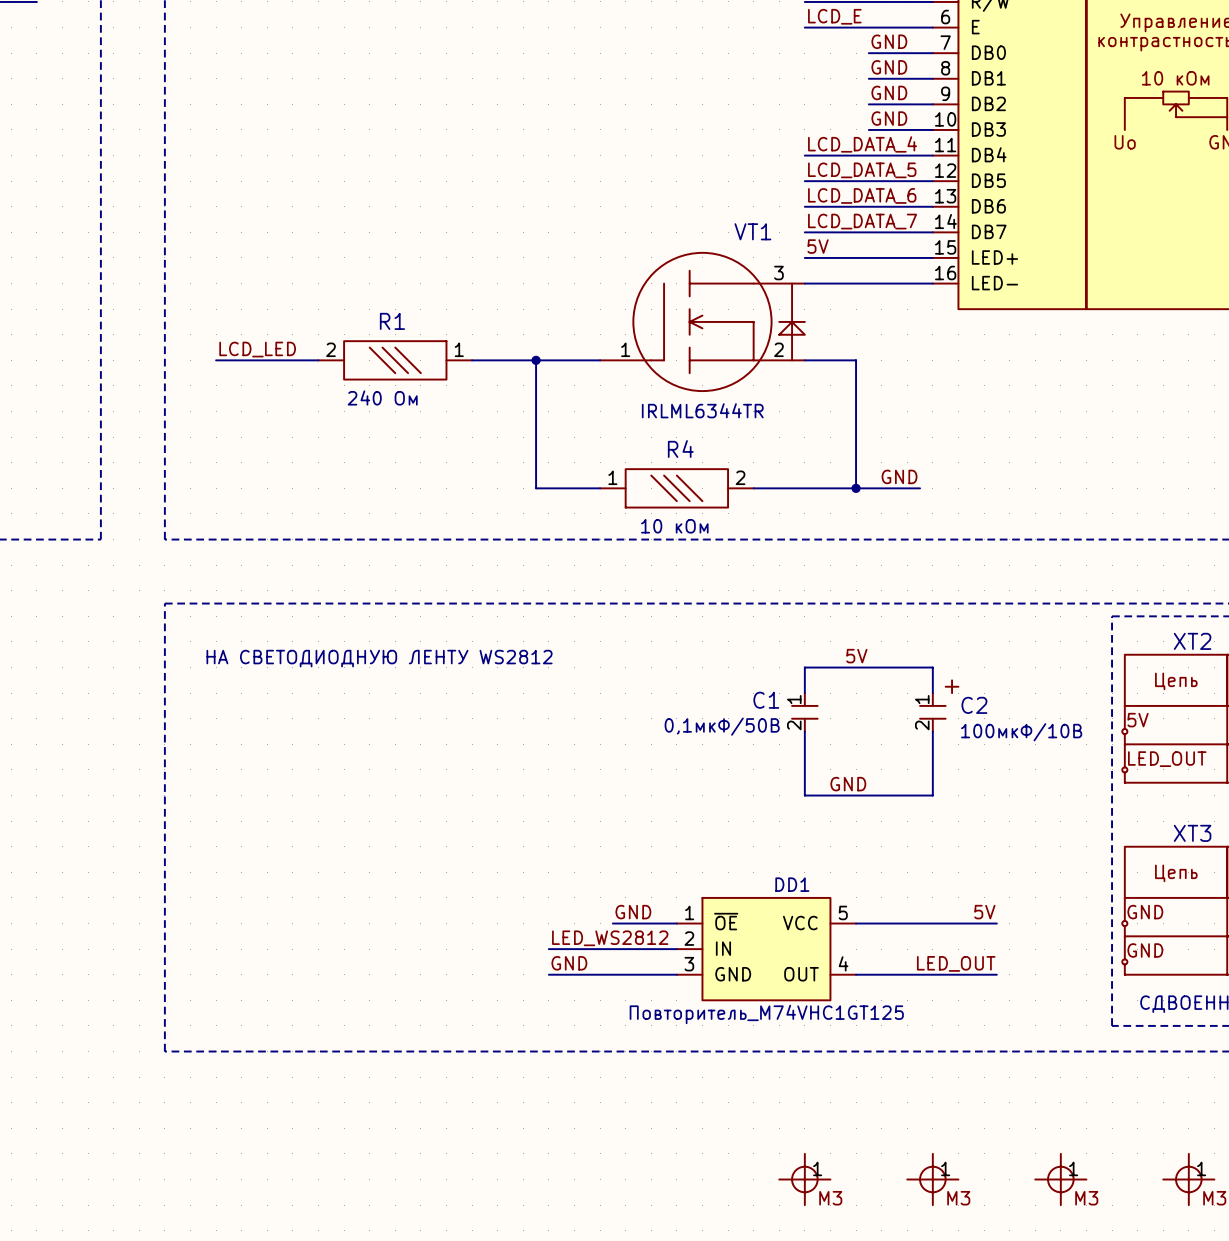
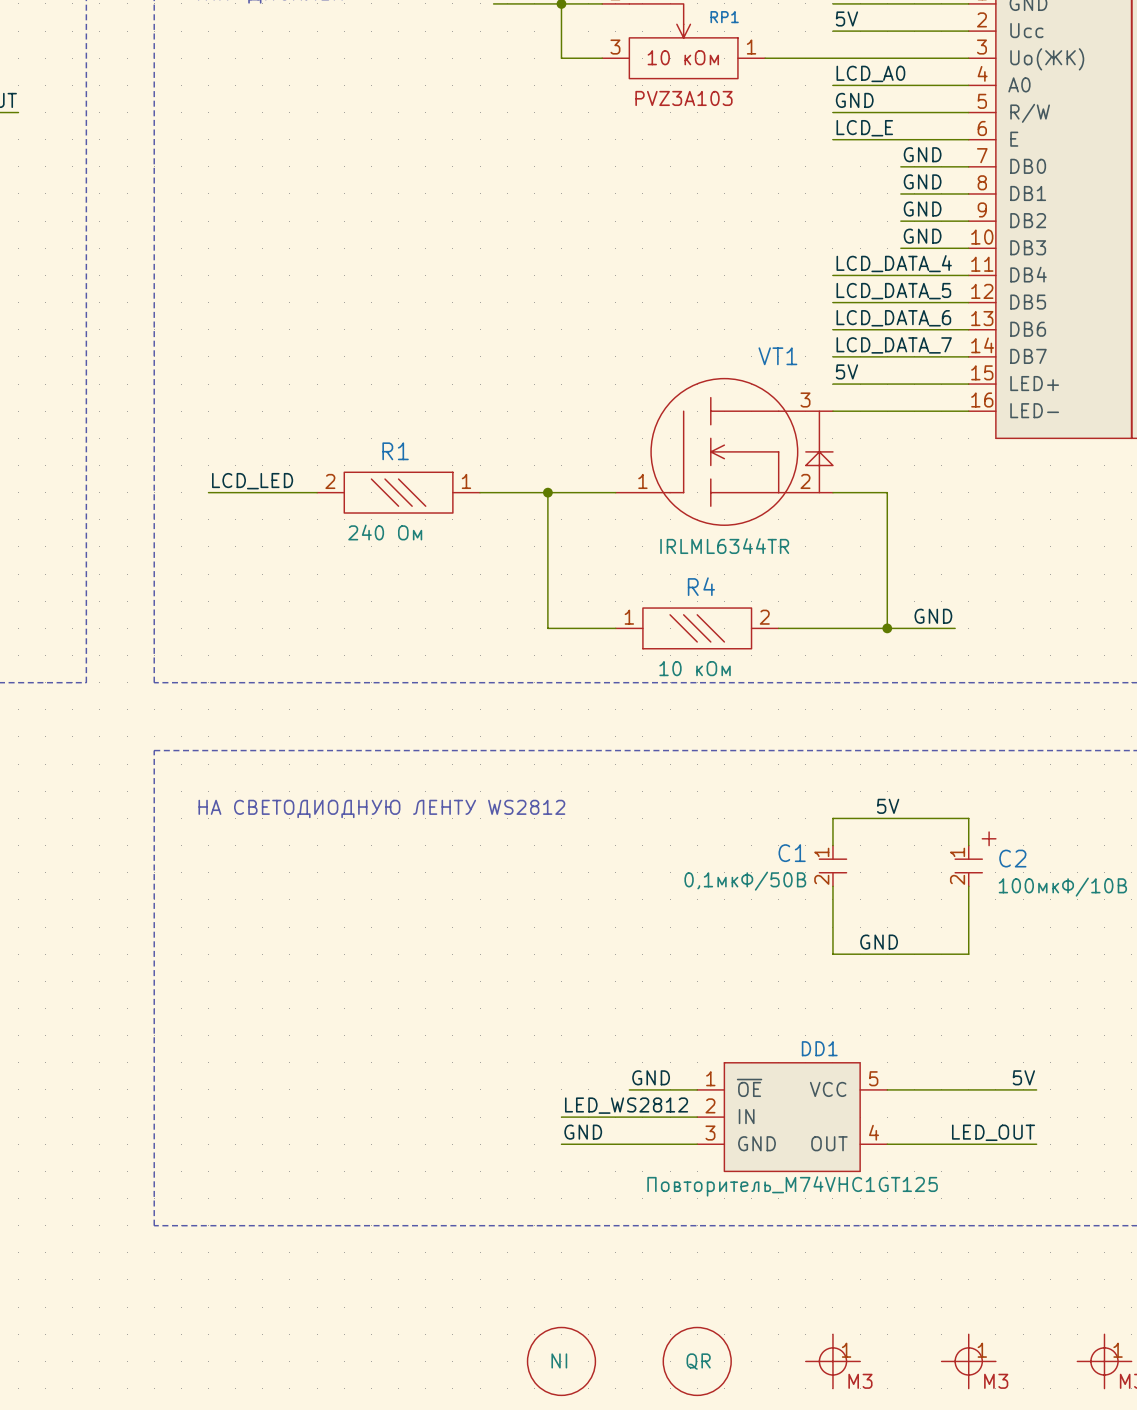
part: none -> NI (561, 1361)
part: none -> QR (697, 1361)

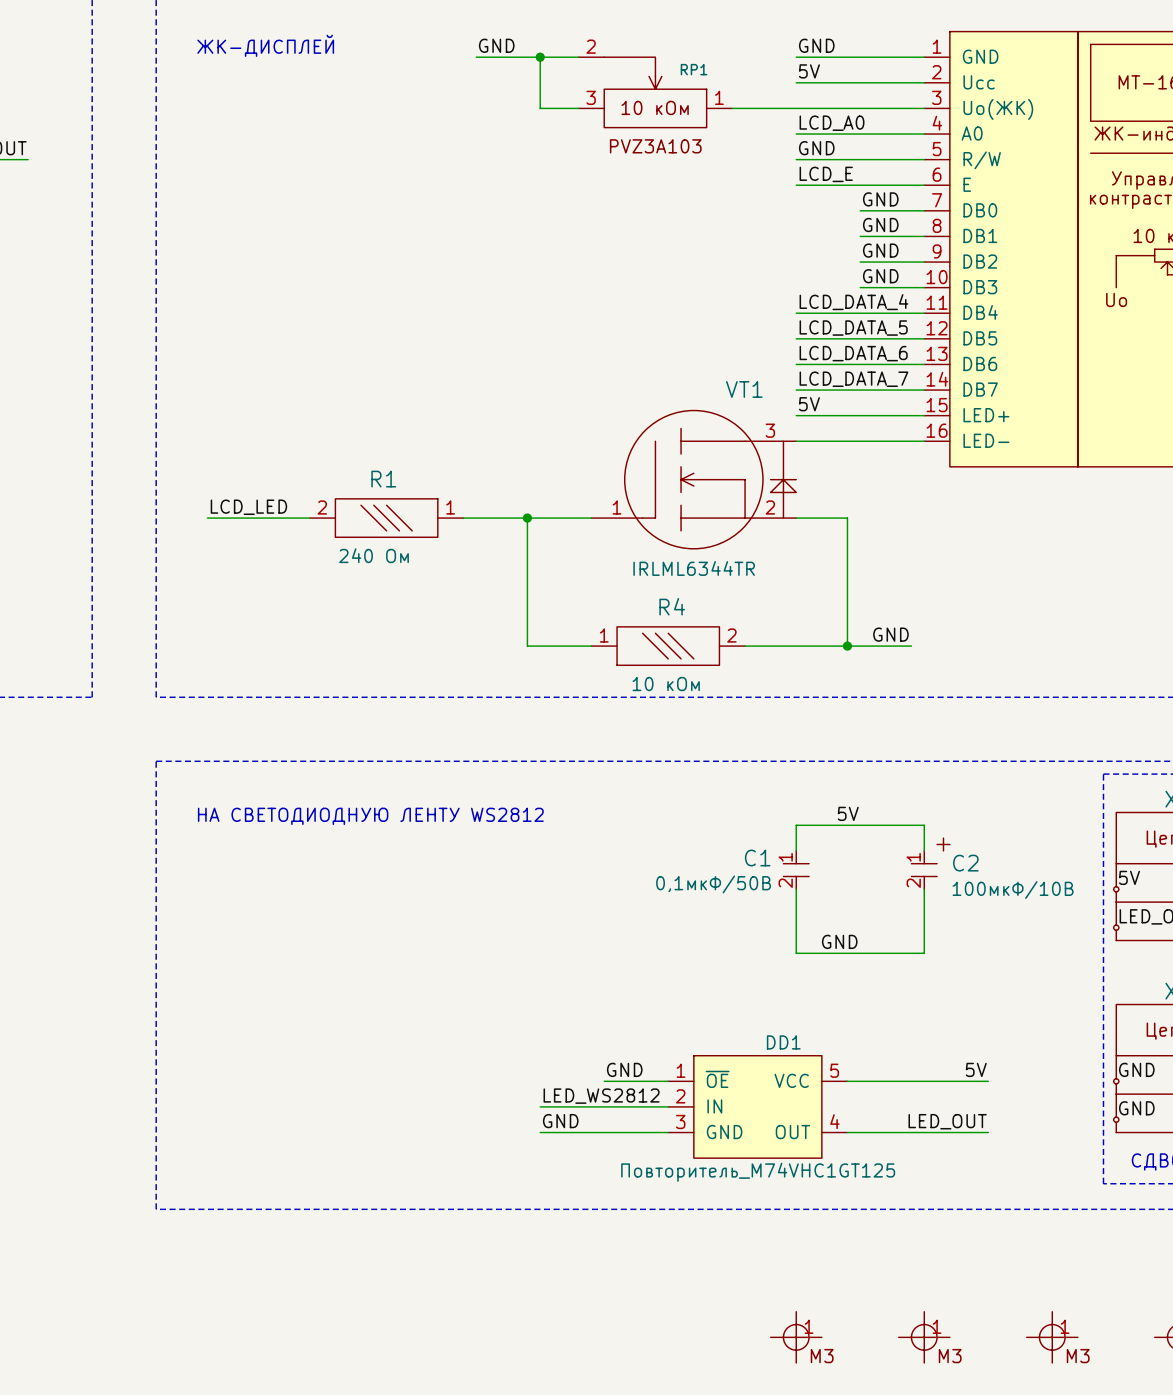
part: NI (561, 1361) -> none
part: QR (697, 1361) -> none

